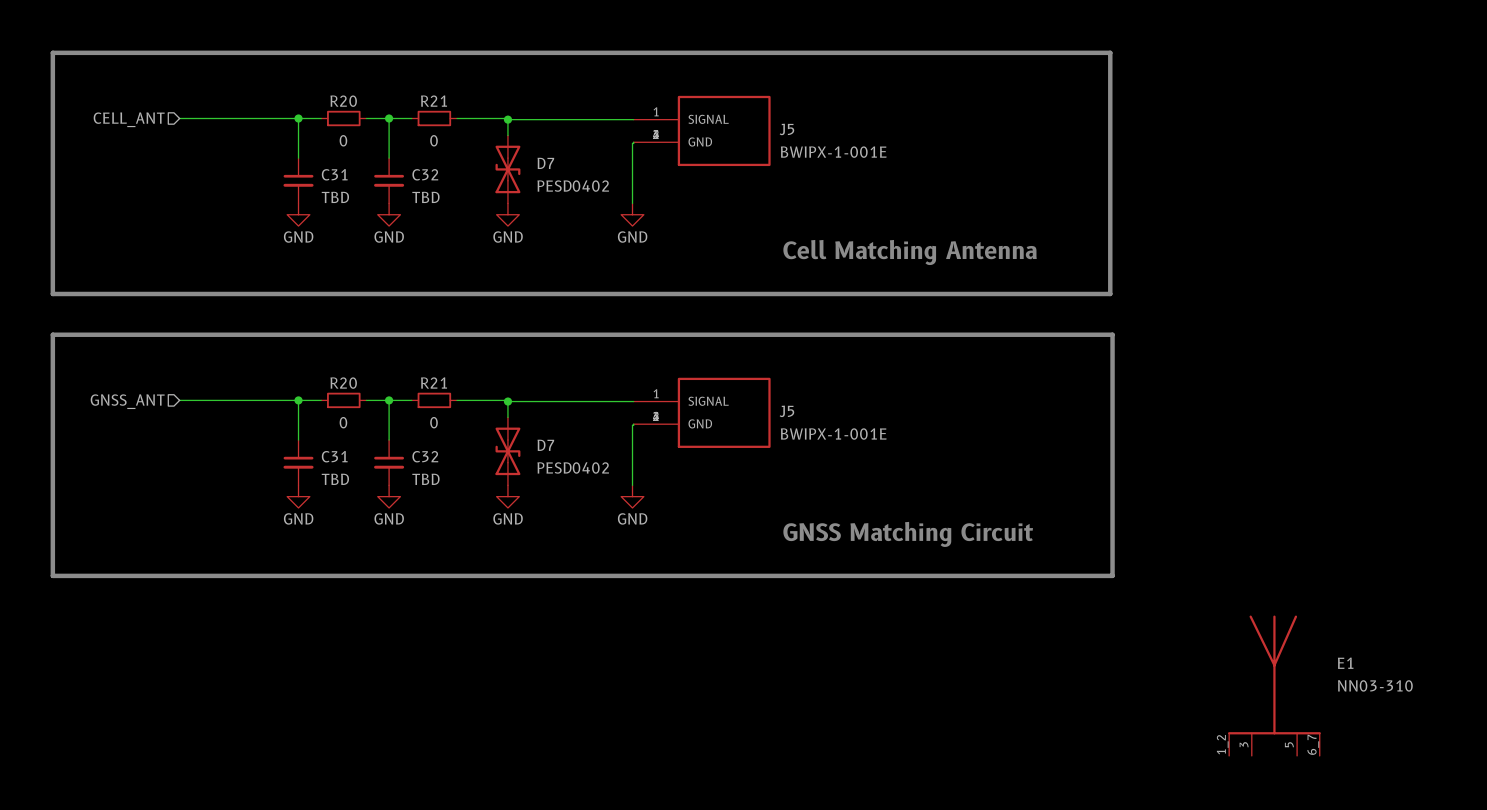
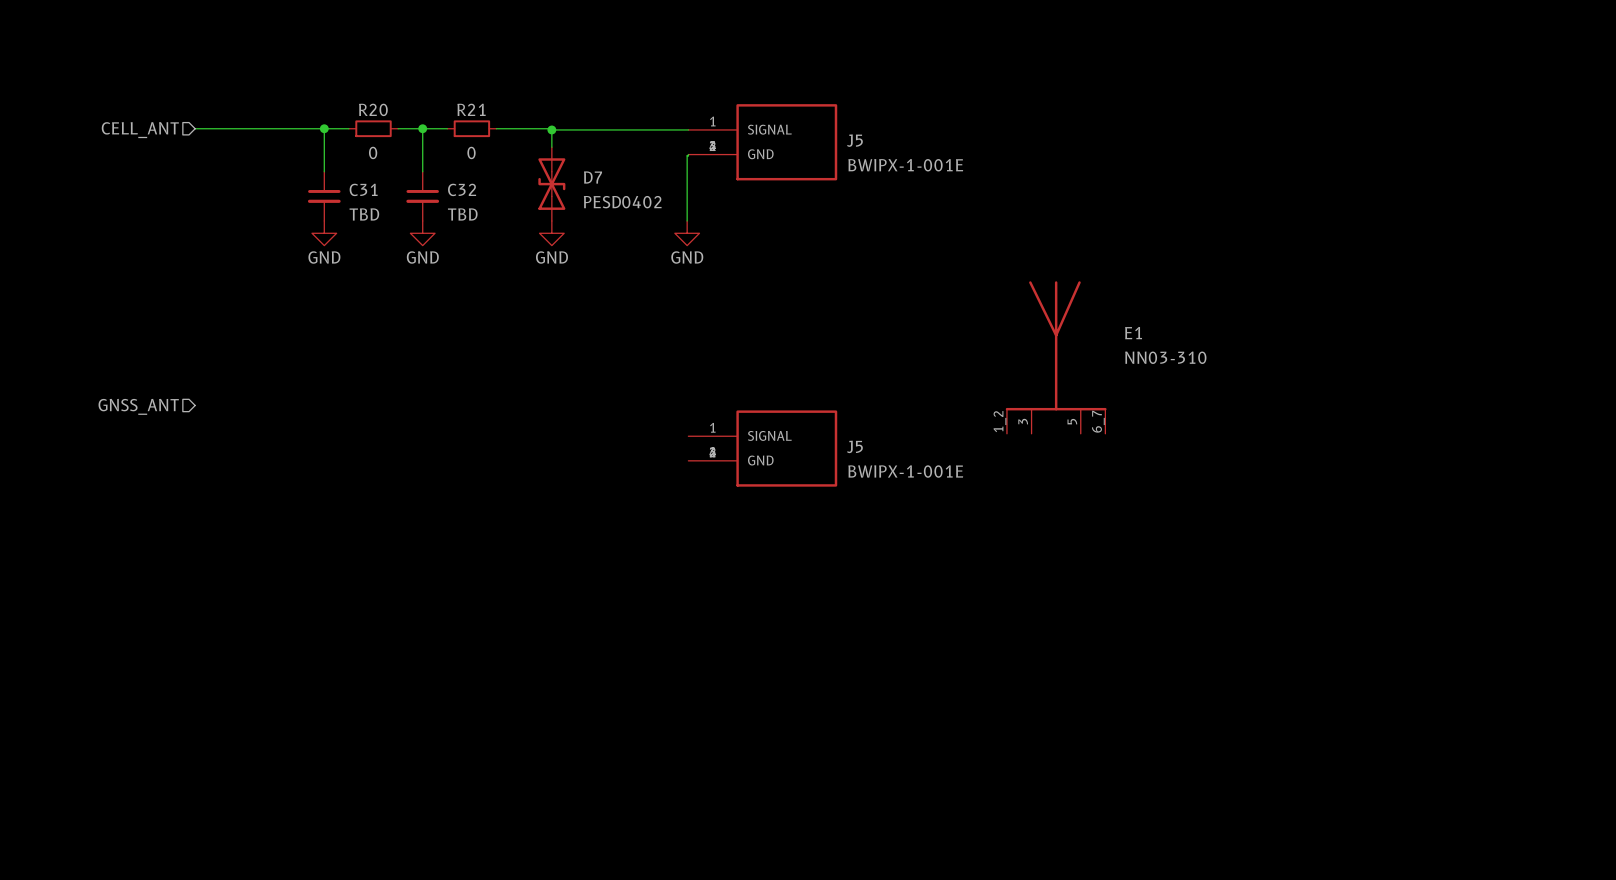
line: (52, 52) (1110, 52) (1110, 293) (52, 293) (52, 52) -> none
text: Cell Matching Antenna (910, 252) -> none
line: (52, 334) (52, 575) (1112, 575) (1112, 334) (52, 334) -> none
wire: (179, 400) (321, 400) -> none
wire: (298, 400) (298, 440) -> none
junction: (298, 400) -> none
R20: 0 (343, 400) -> none
wire: (366, 400) (411, 400) -> none
wire: (389, 400) (389, 440) -> none
junction: (389, 400) -> none
R21: 0 (434, 400) -> none
wire: (457, 400) (507, 400) (507, 417) -> none
hierarchical label position: GNSS_ANT (127, 401) -> GNSS_ANT (138, 406)
wire: (507, 401) (633, 401) -> none
junction: (507, 401) -> none
wire: (633, 424) (632, 485) -> none
D7: PESD0402 (507, 451) -> none
C31: TBD (298, 462) -> none
C32: TBD (389, 462) -> none
power symbol: GND (298, 496) -> none
power symbol: GND (389, 496) -> none
power symbol: GND (507, 496) -> none
power symbol: GND (632, 496) -> none
text: GNSS Matching Circuit (908, 534) -> none
E1 position: (1274, 685) -> (1056, 357)

